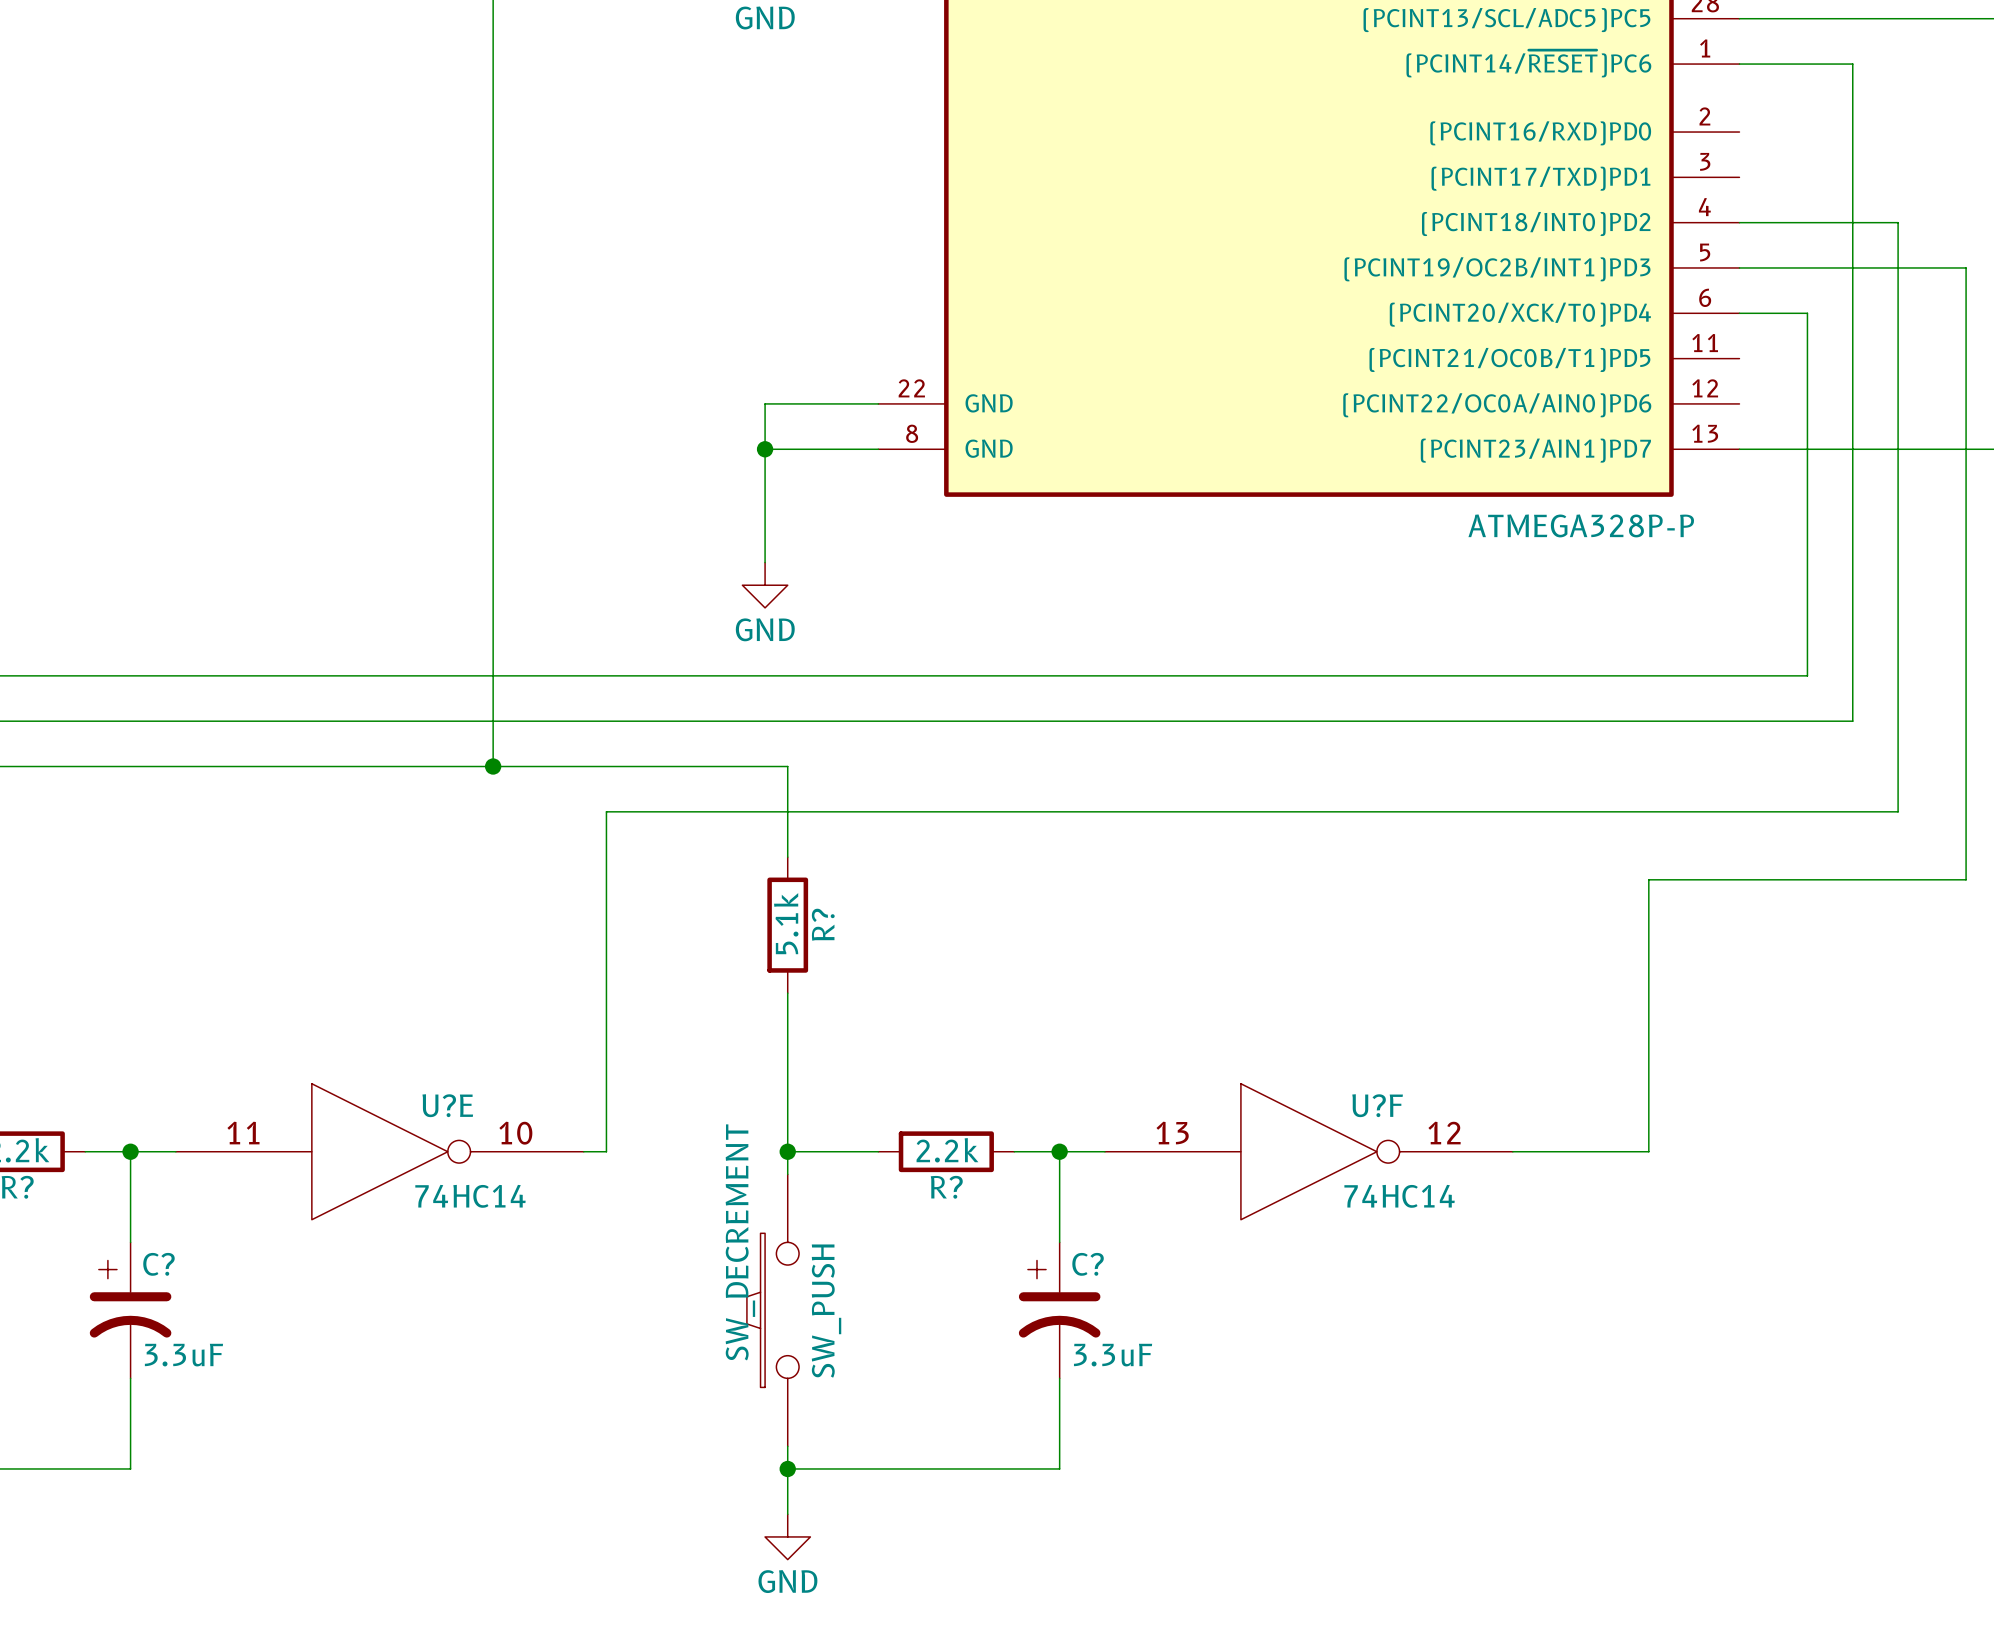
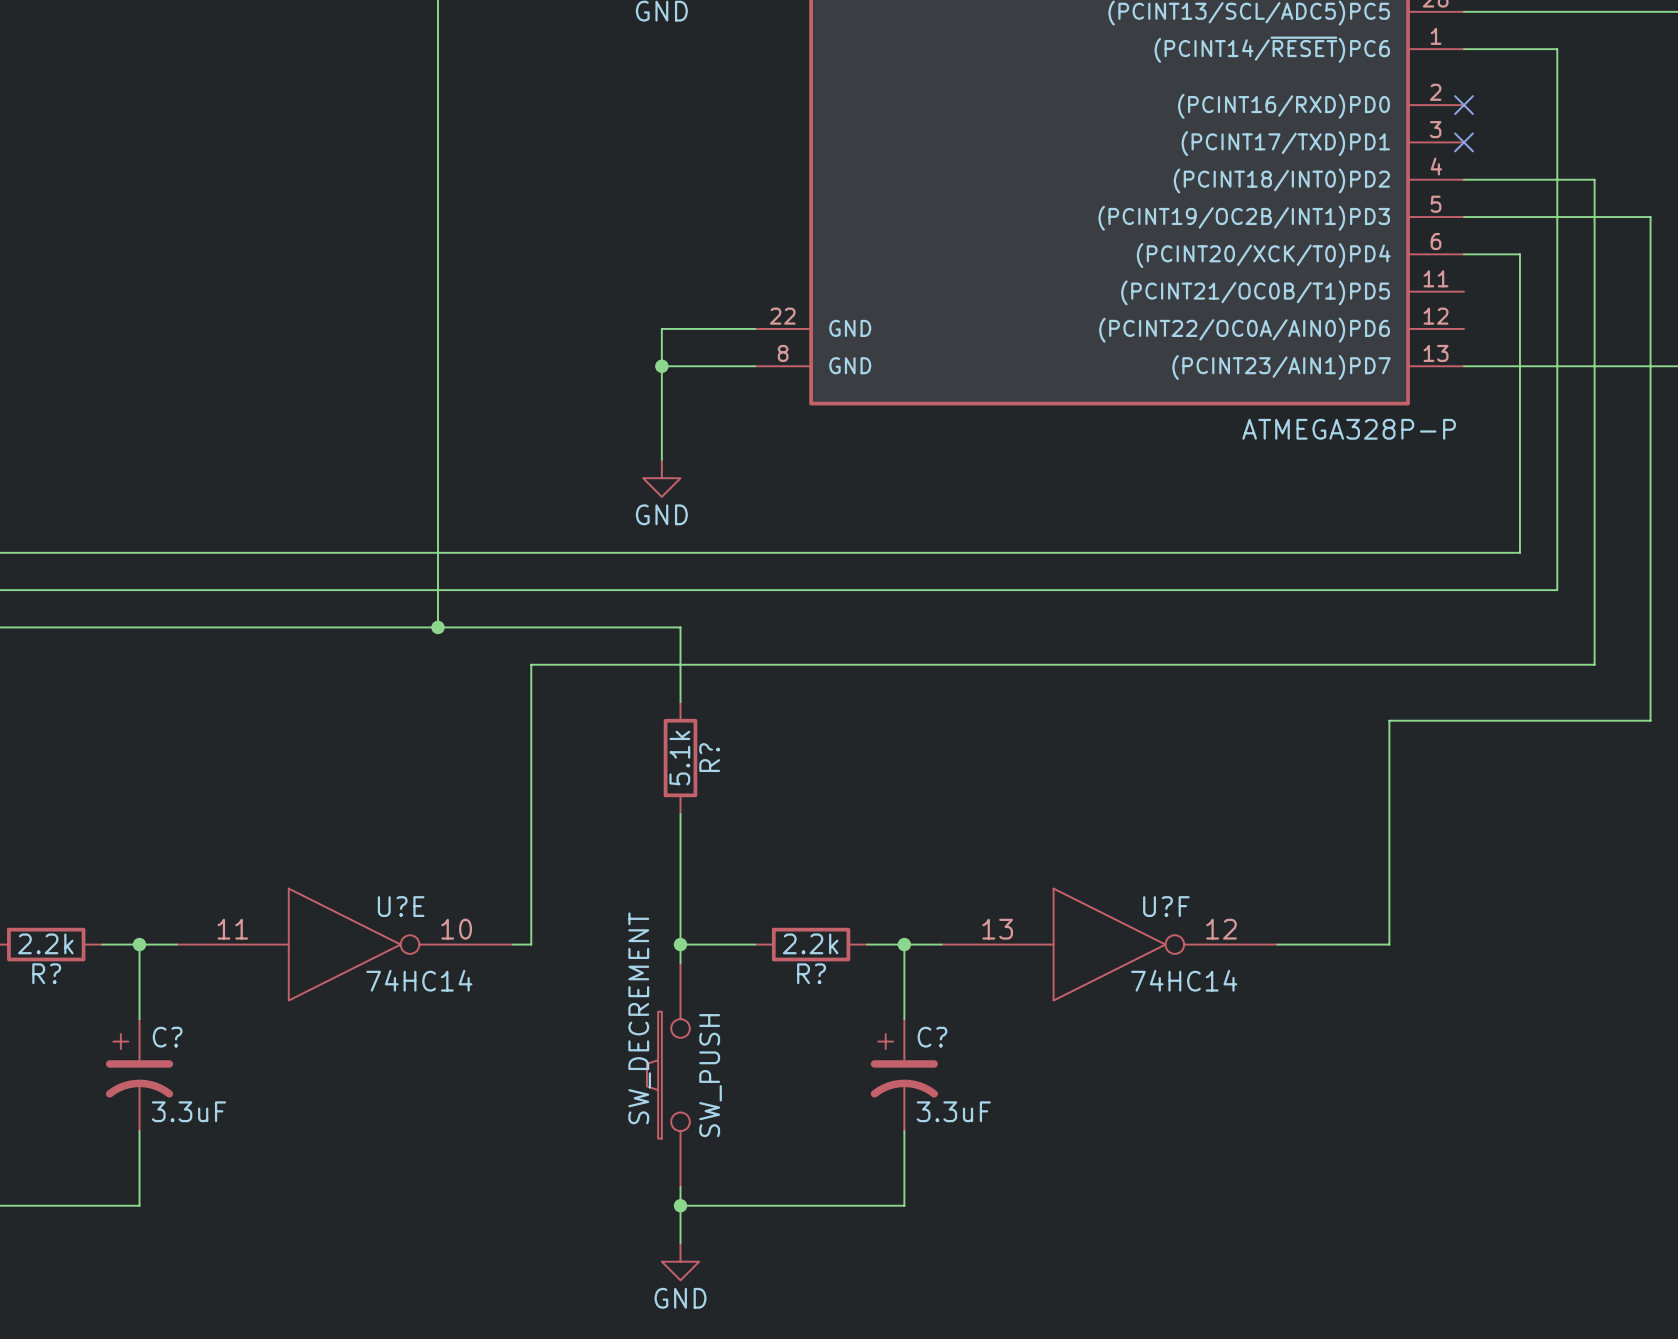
no-connect mark: none -> (1464, 105)
no-connect mark: none -> (1464, 142)

